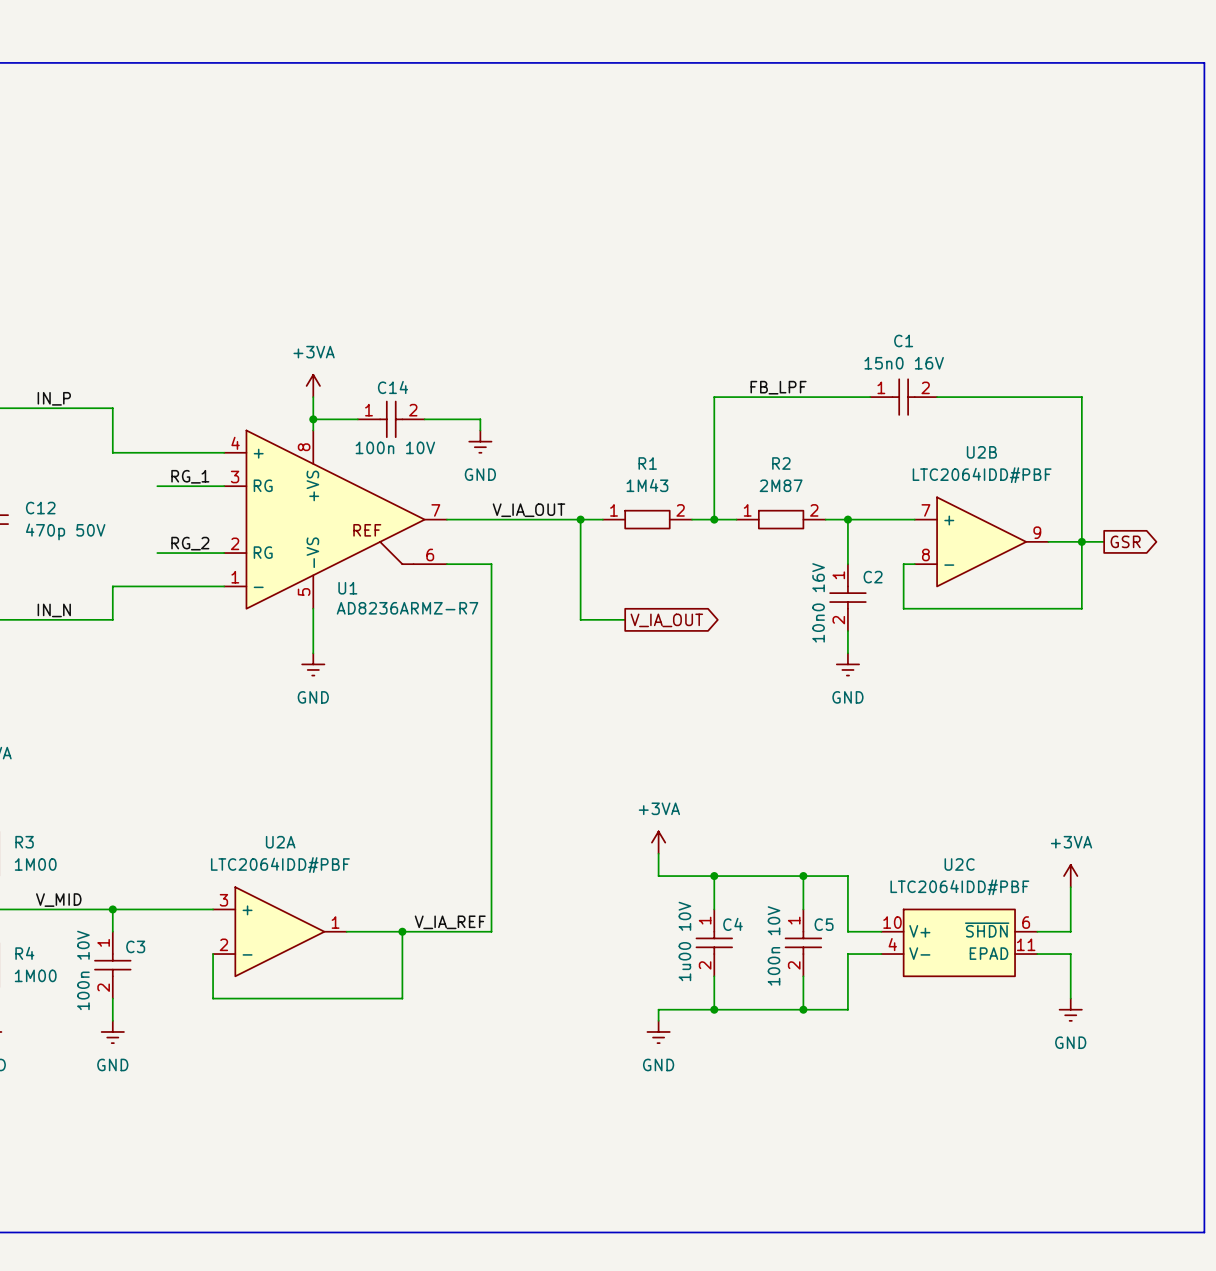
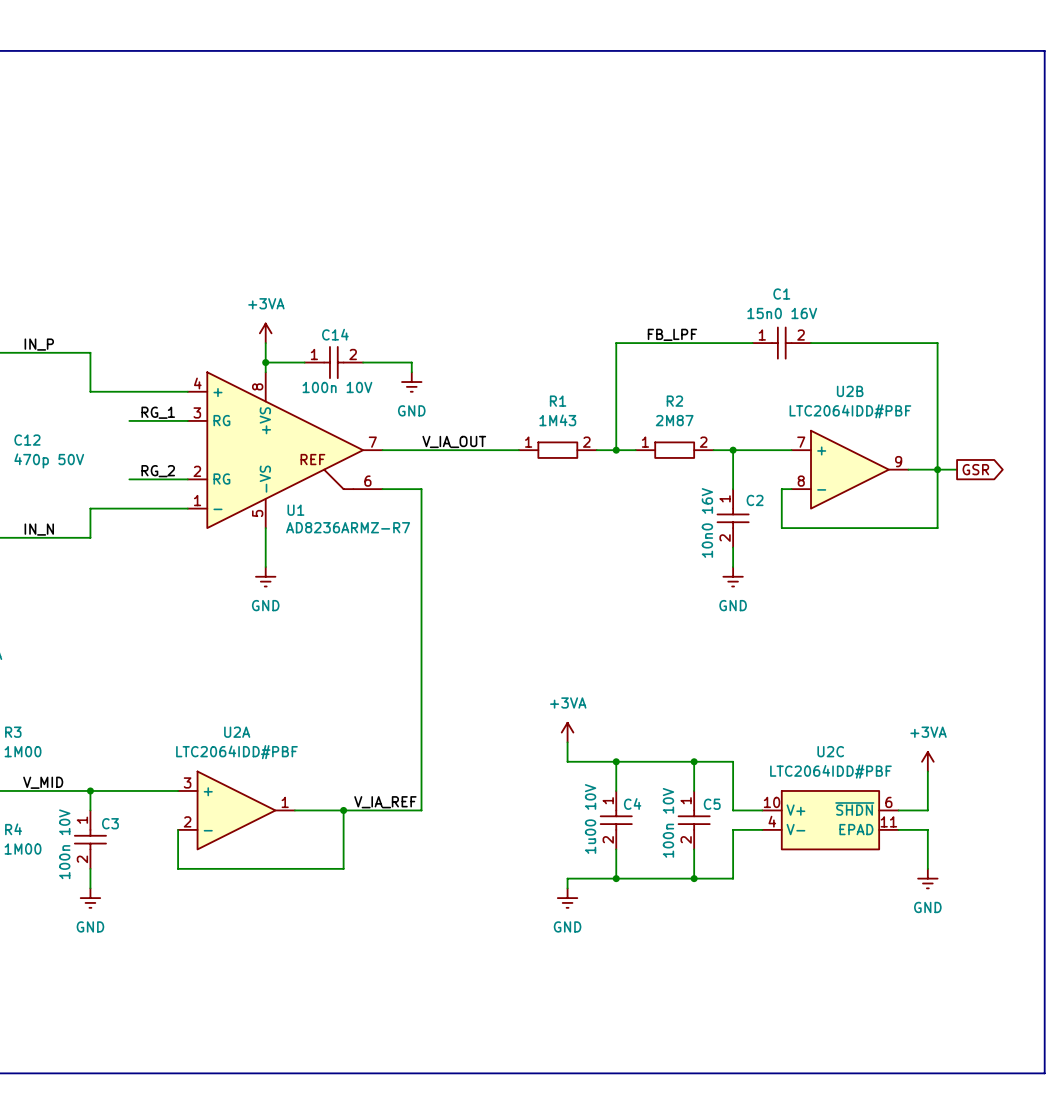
wire: (580, 519) (580, 619) (625, 619) -> none
junction: (580, 519) -> none
global label: V_IA_OUT (666, 620) -> none

